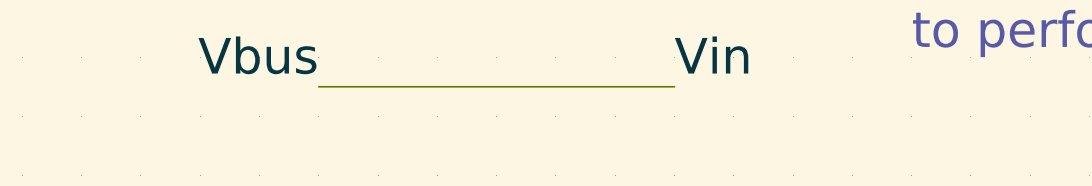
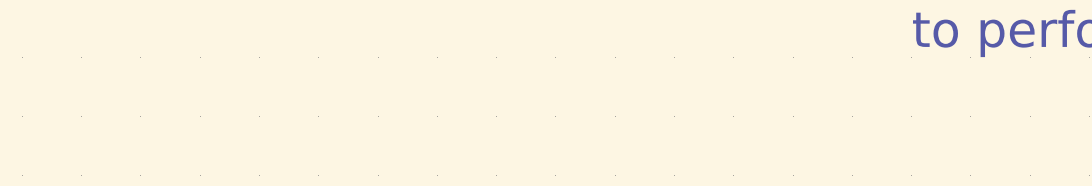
label: Vin (711, 54) -> none
label: Vbus (257, 55) -> none
wire: (318, 86) (674, 86) -> none

